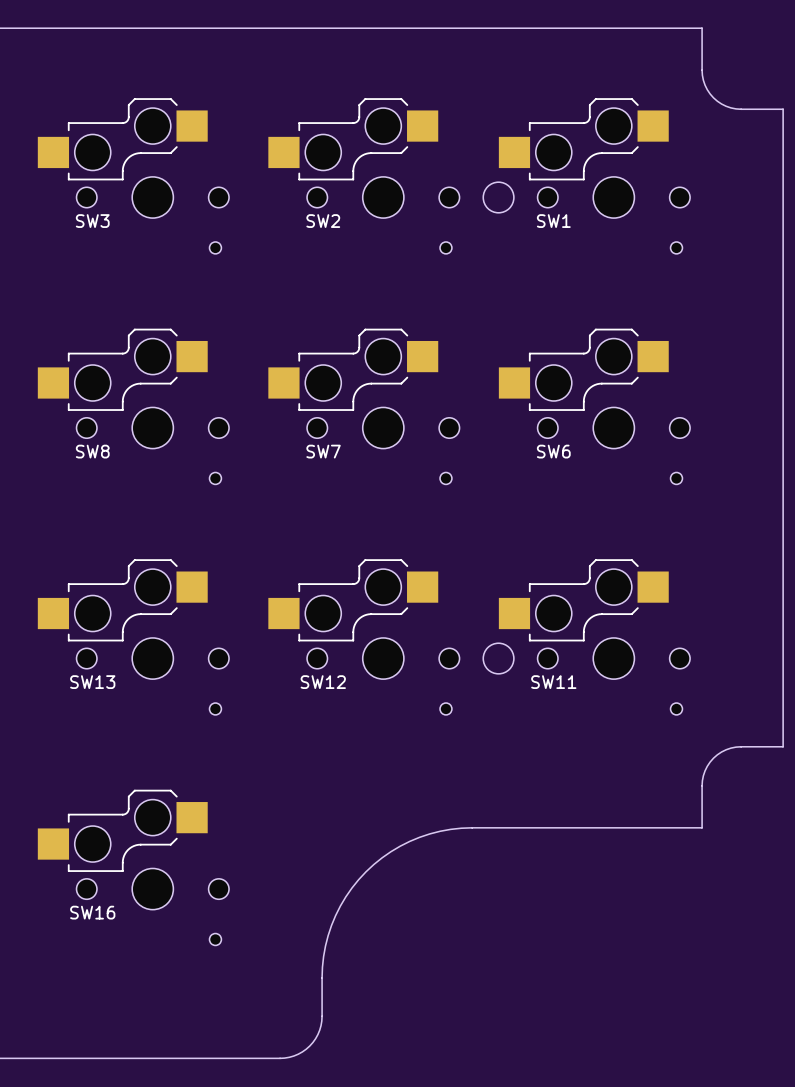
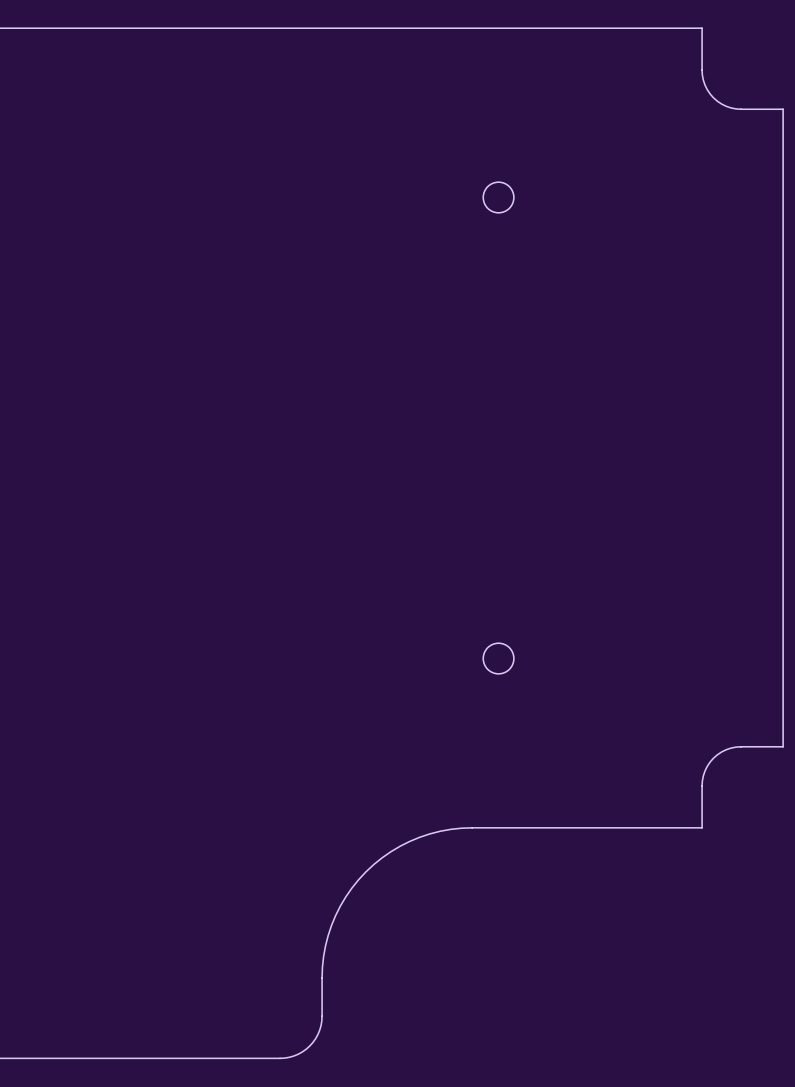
SW3: (133, 176) -> none
SW2: (363, 176) -> none
SW1: (594, 176) -> none
SW8: (133, 406) -> none
SW7: (363, 406) -> none
SW6: (594, 406) -> none
SW13: (133, 637) -> none
SW12: (363, 637) -> none
SW11: (594, 637) -> none
SW16: (133, 867) -> none

